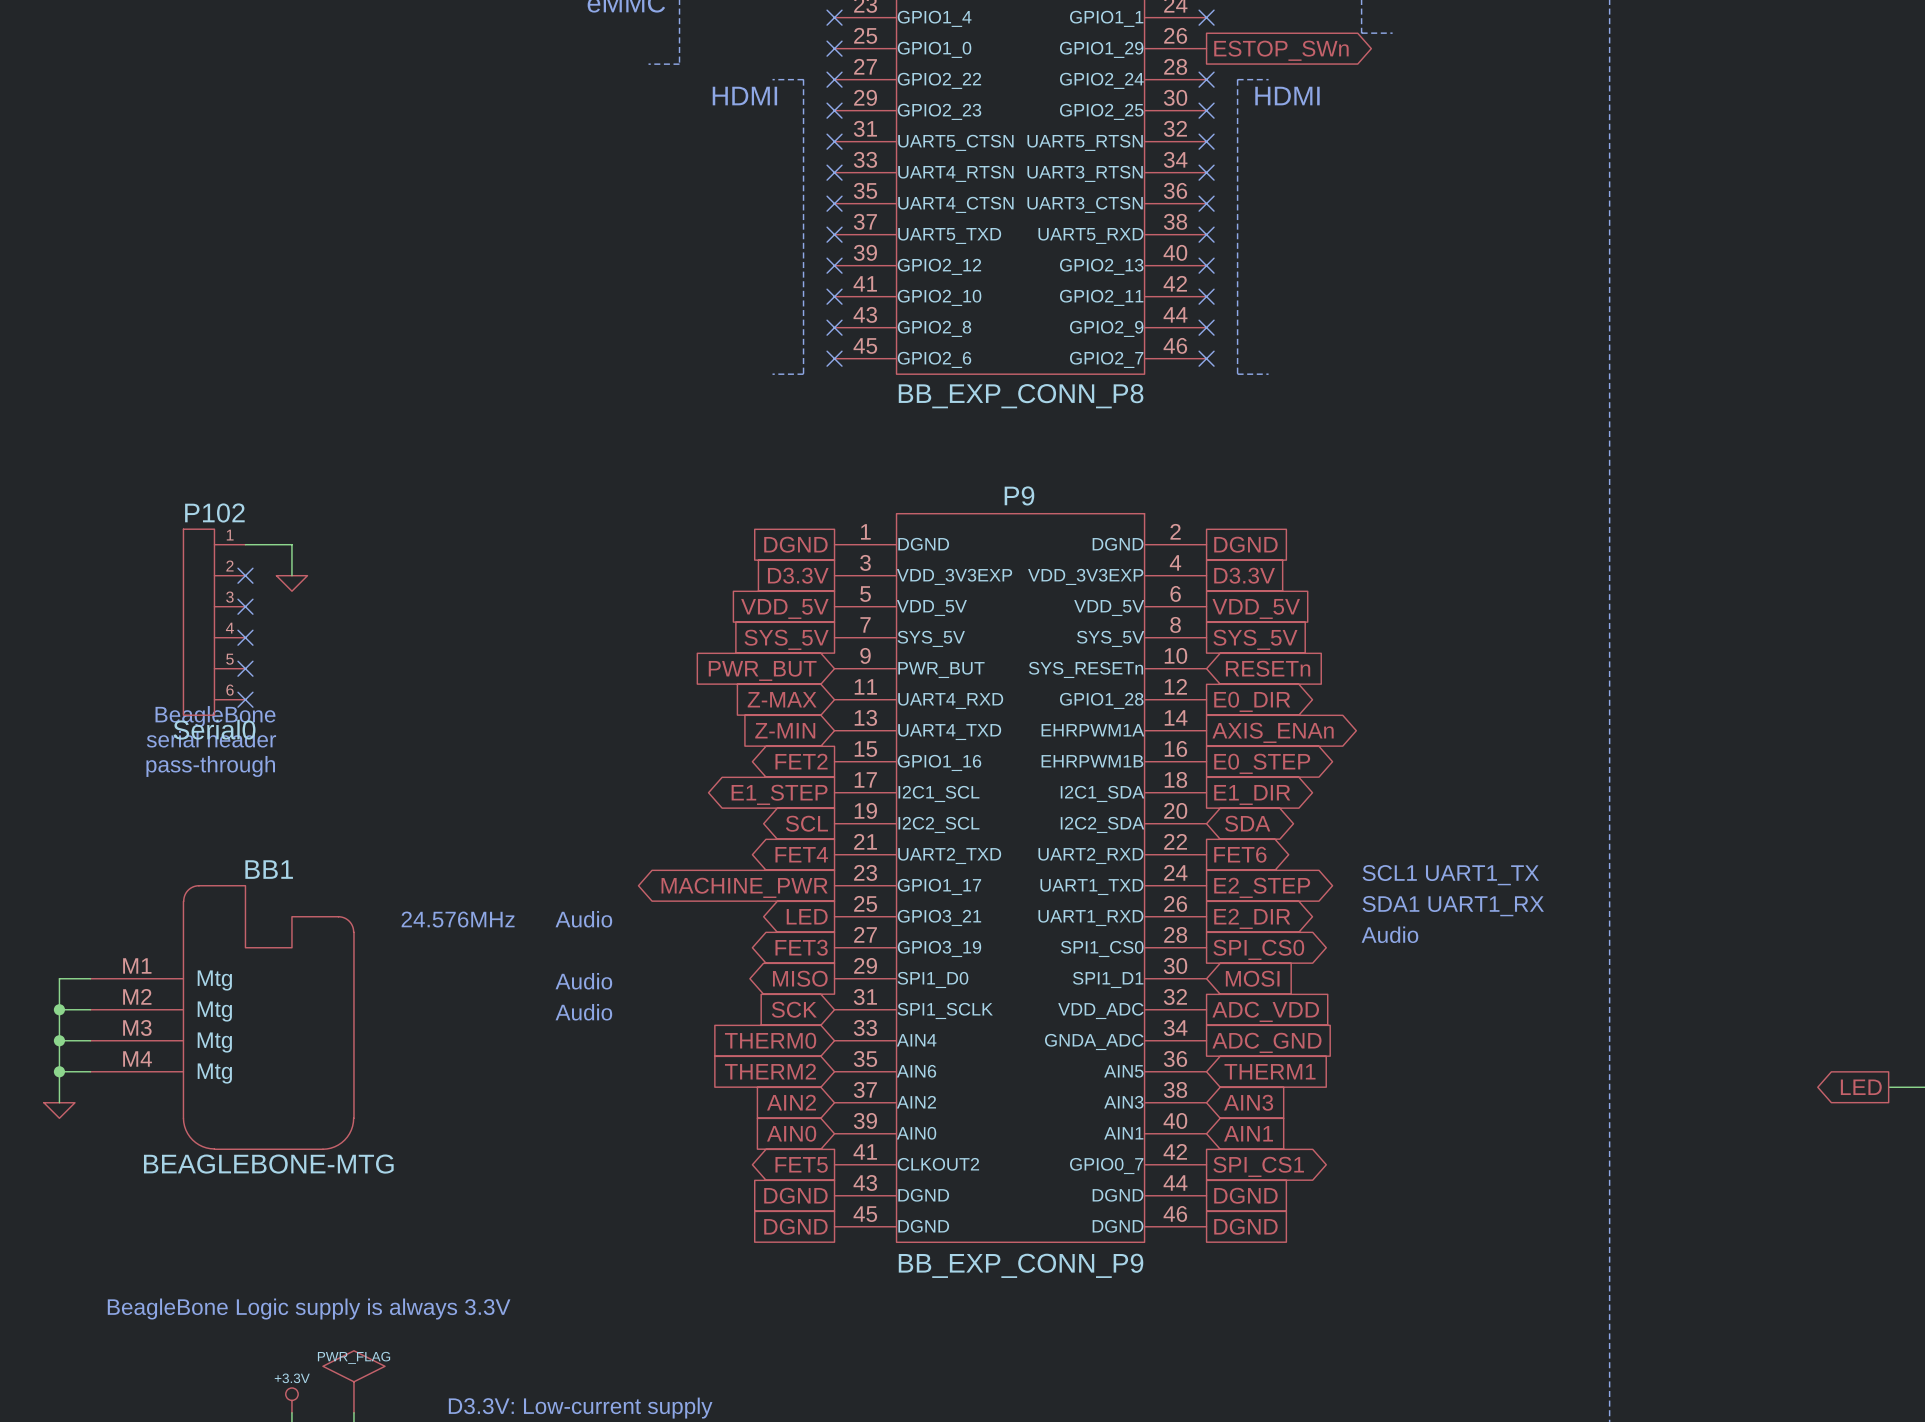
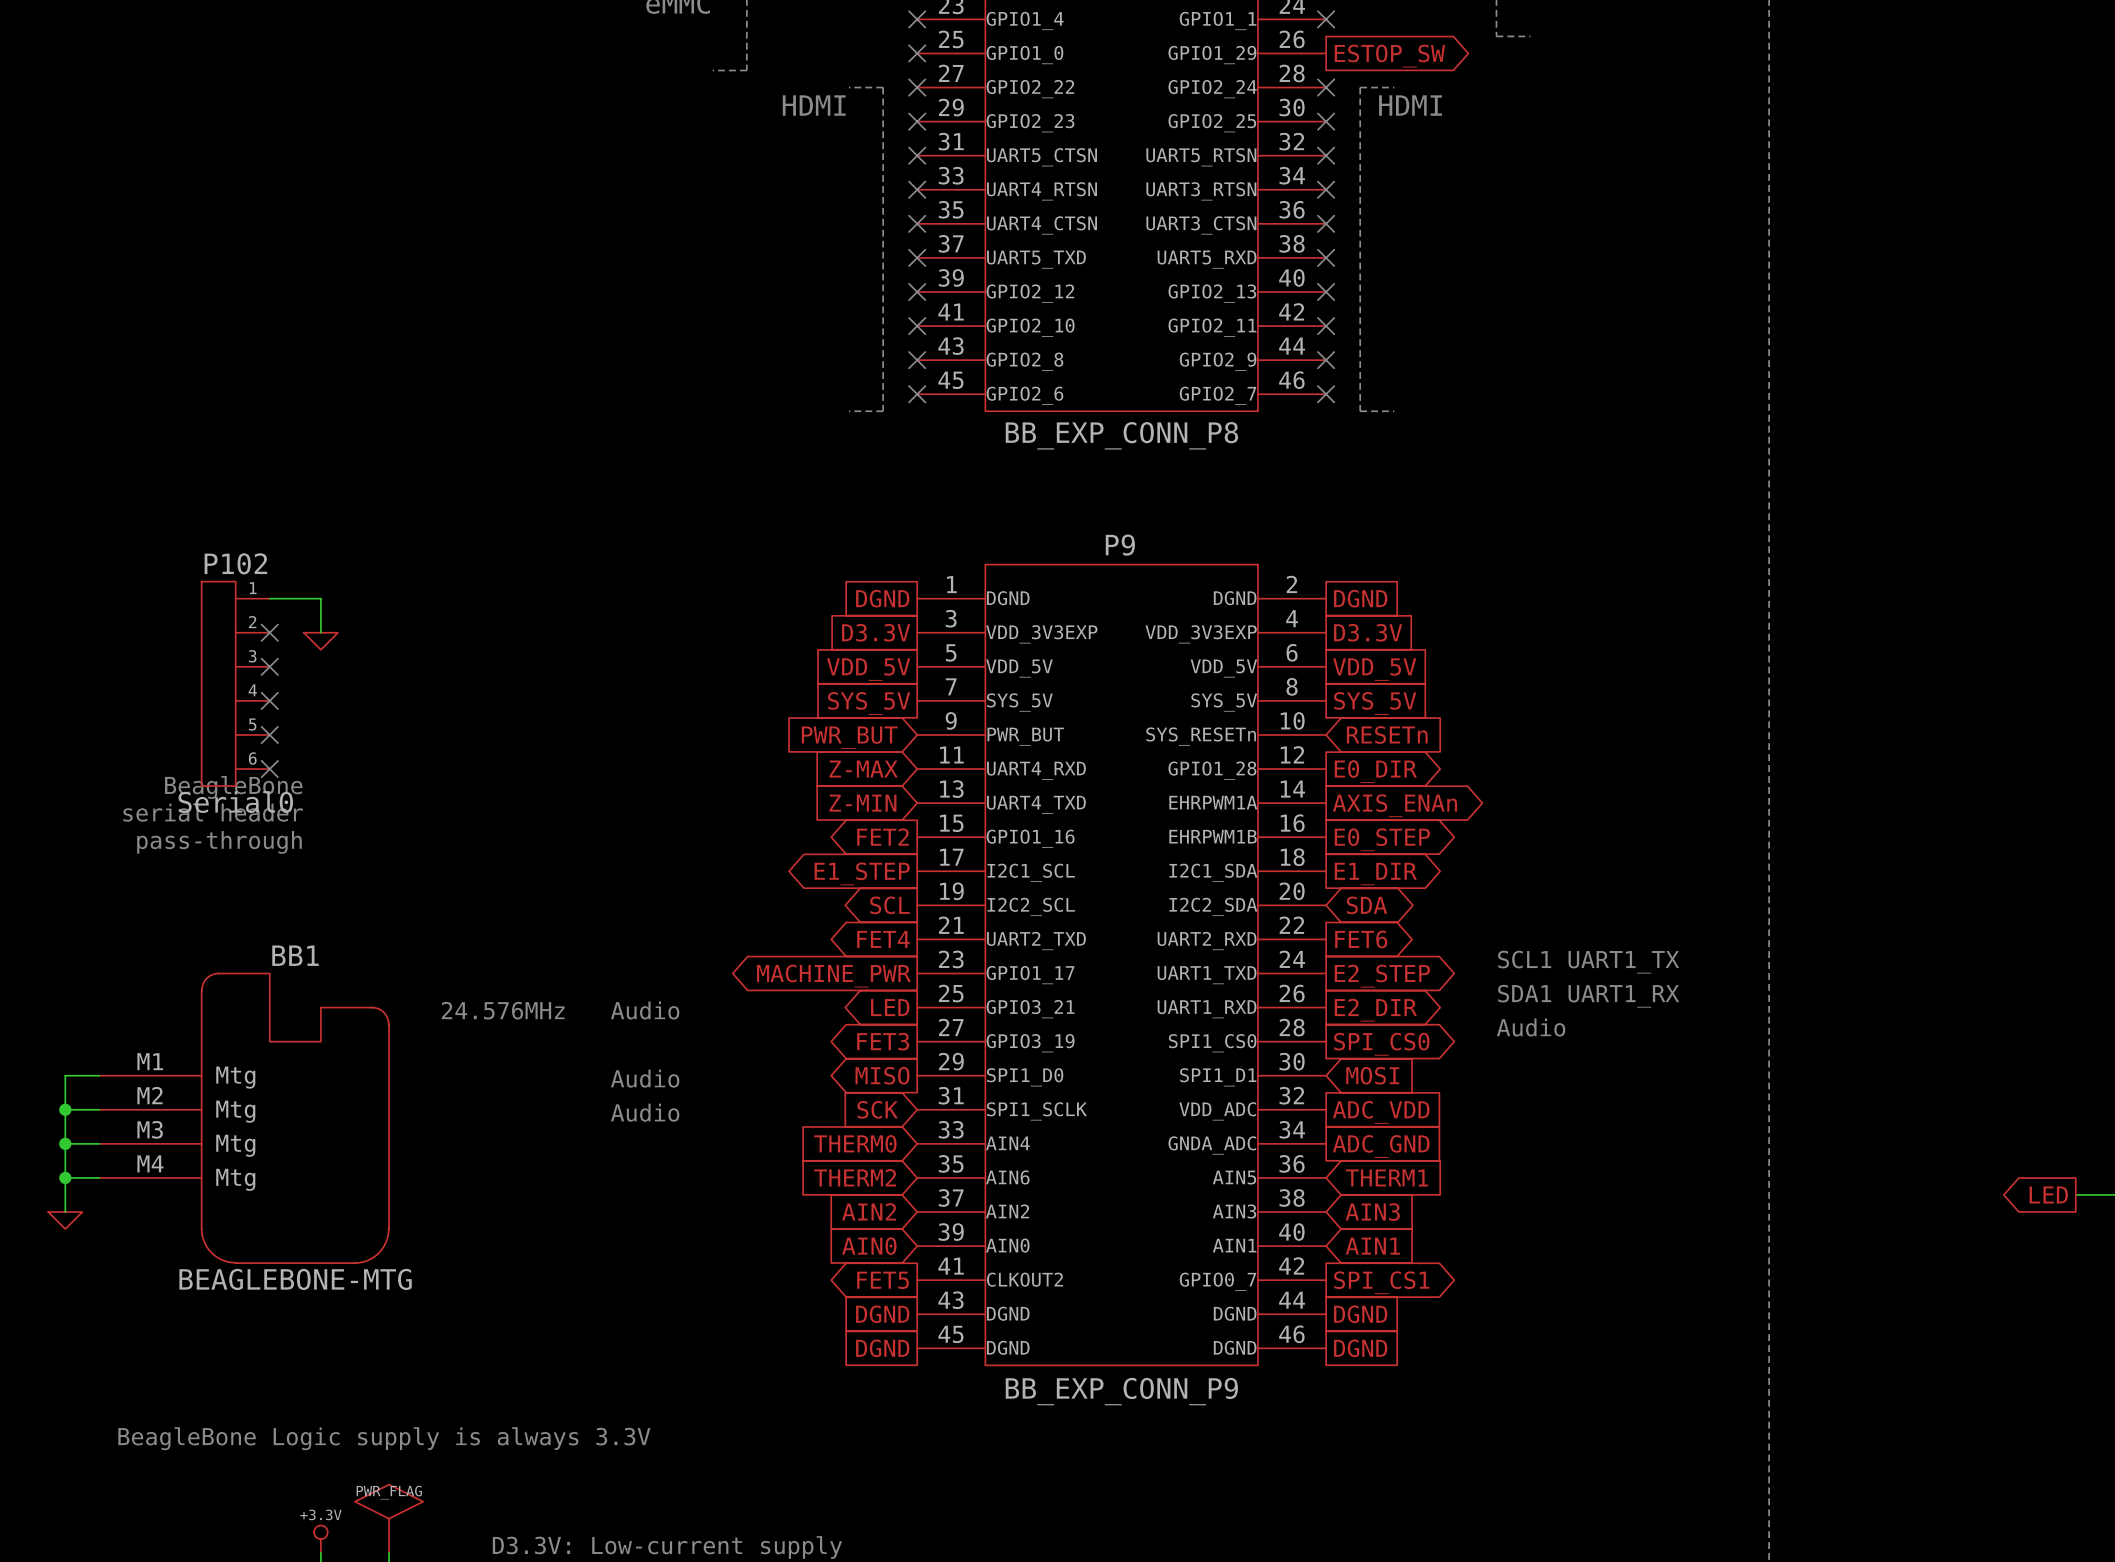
global label: ESTOP_SWn (1281, 50) -> ESTOP_SW (1389, 56)

